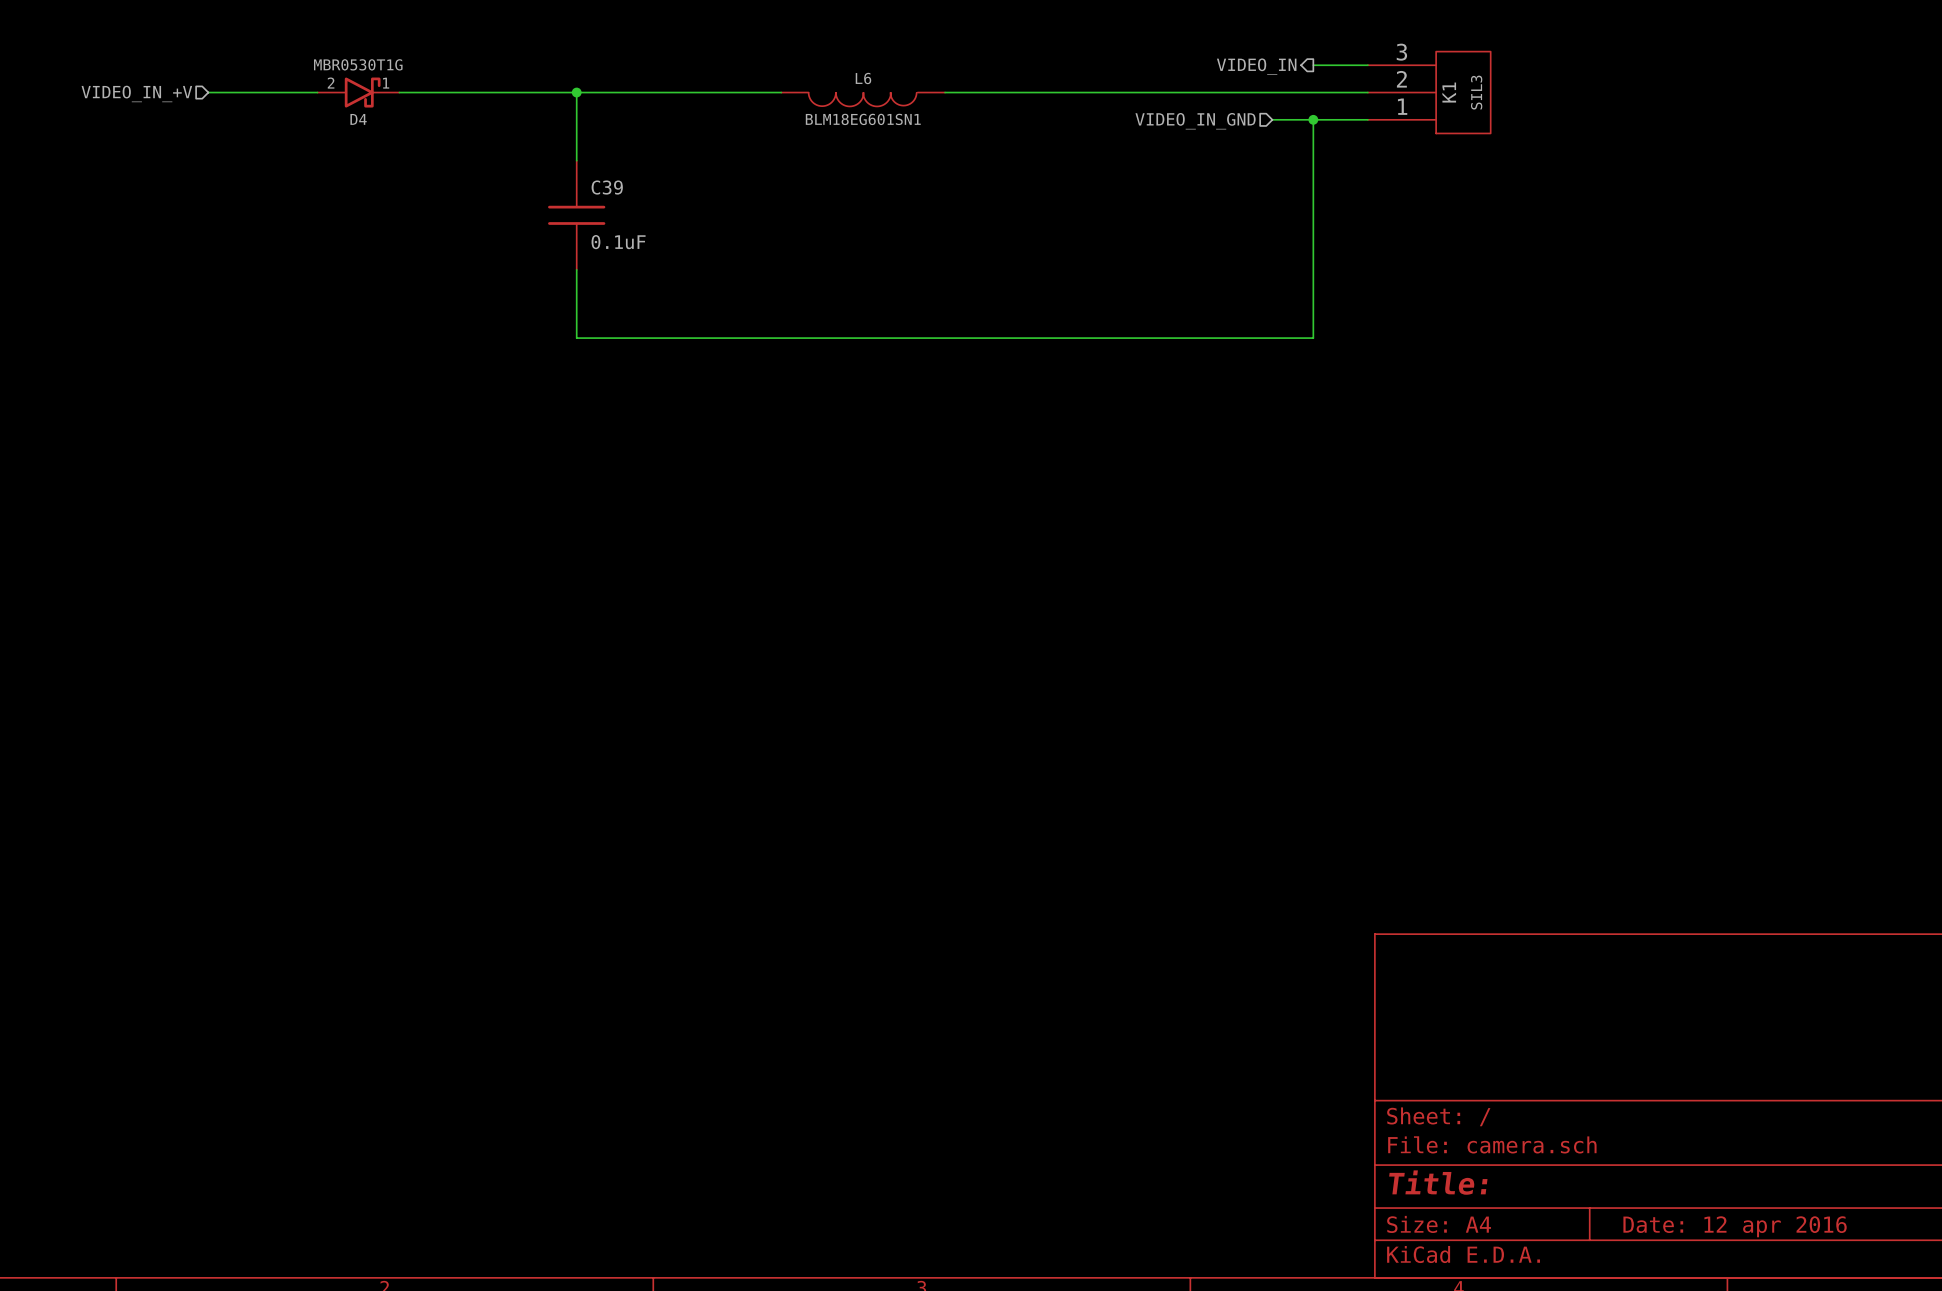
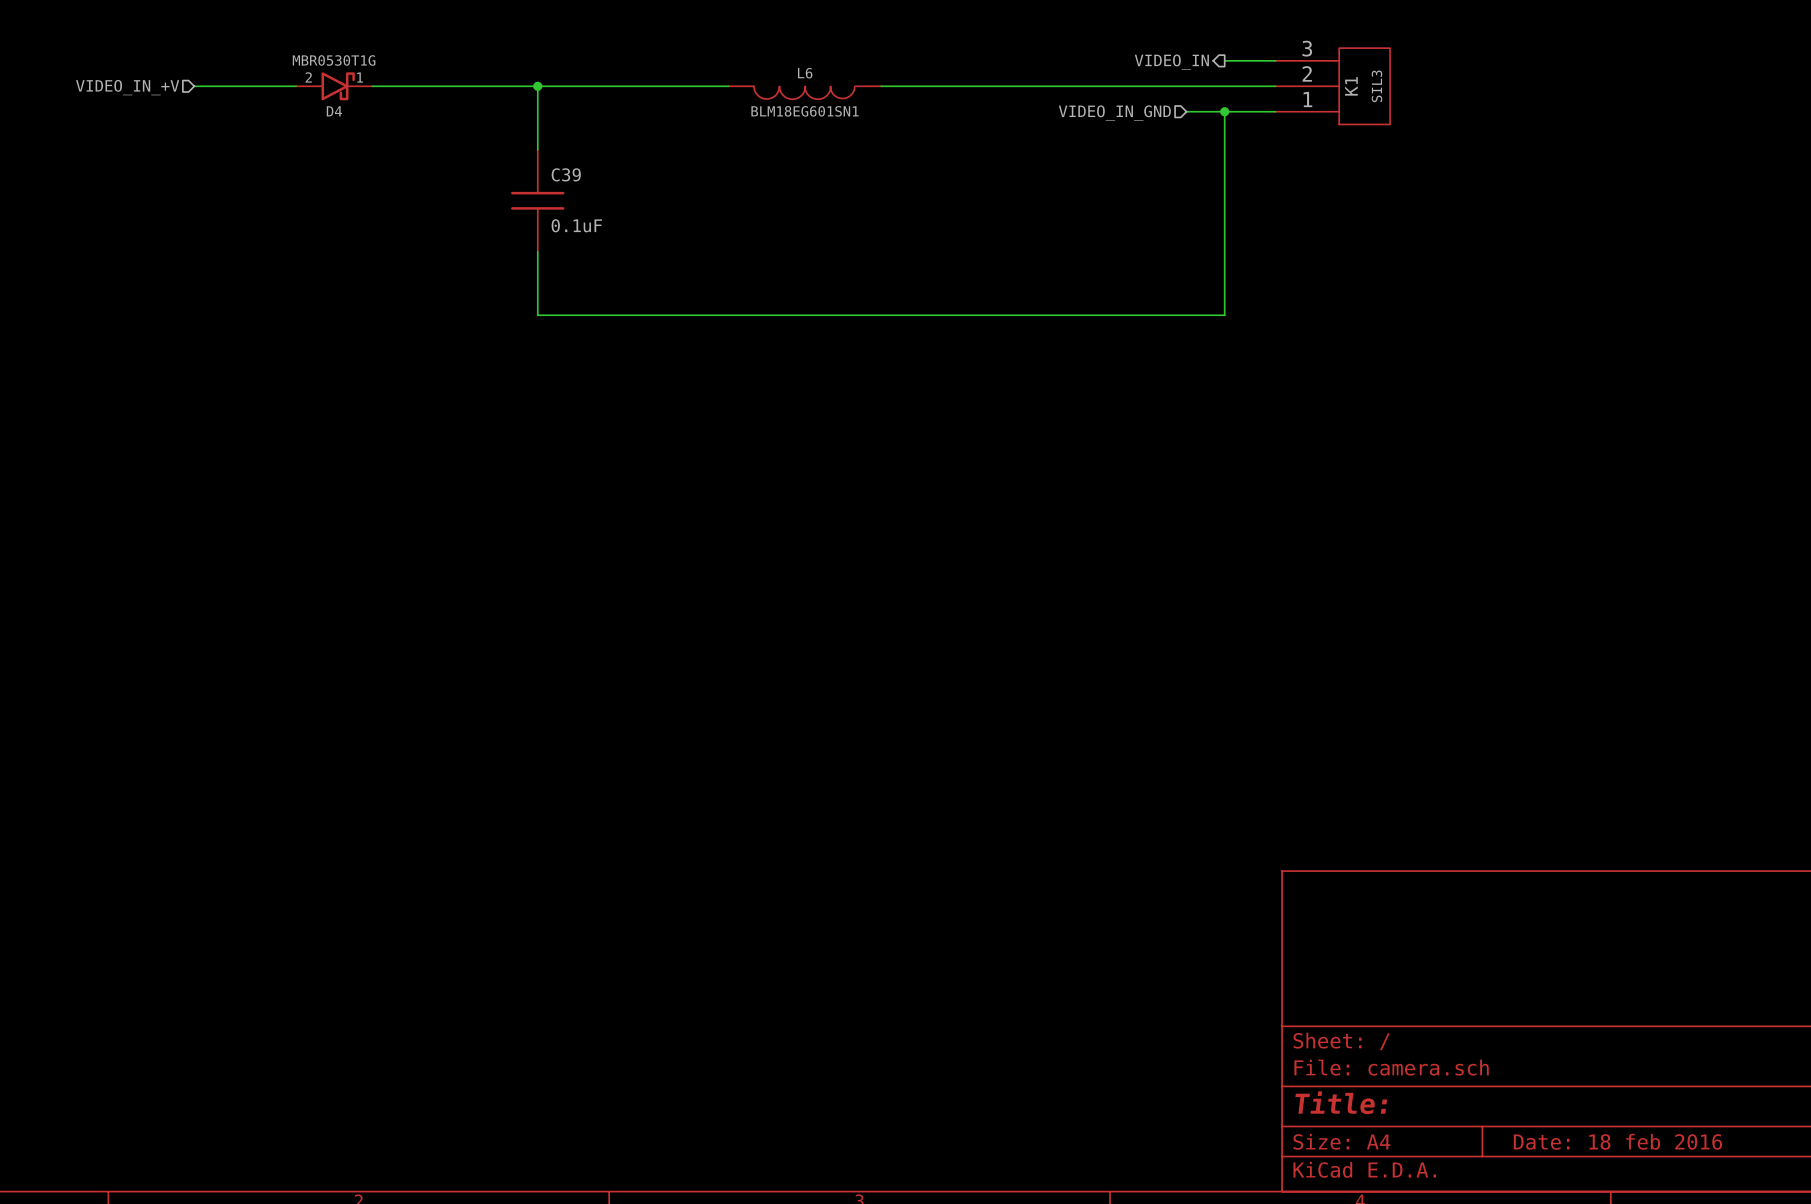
title block: Date: 12 apr 2016 (1735, 1226) -> Date: 18 feb 2016 (1617, 1141)

